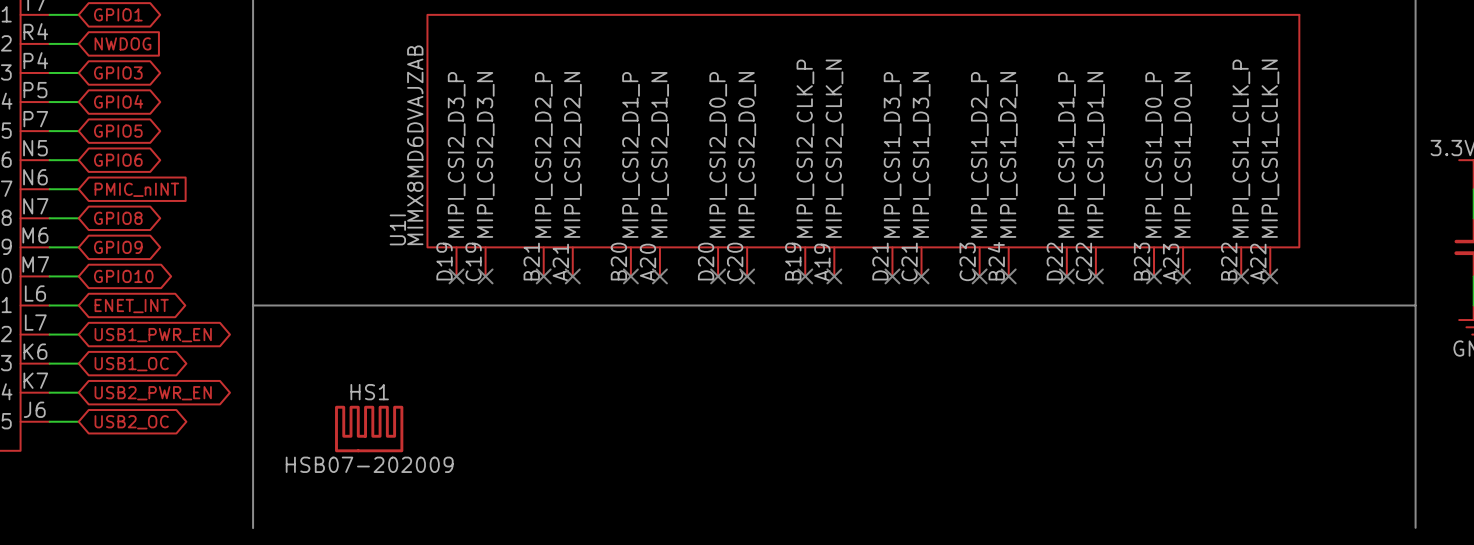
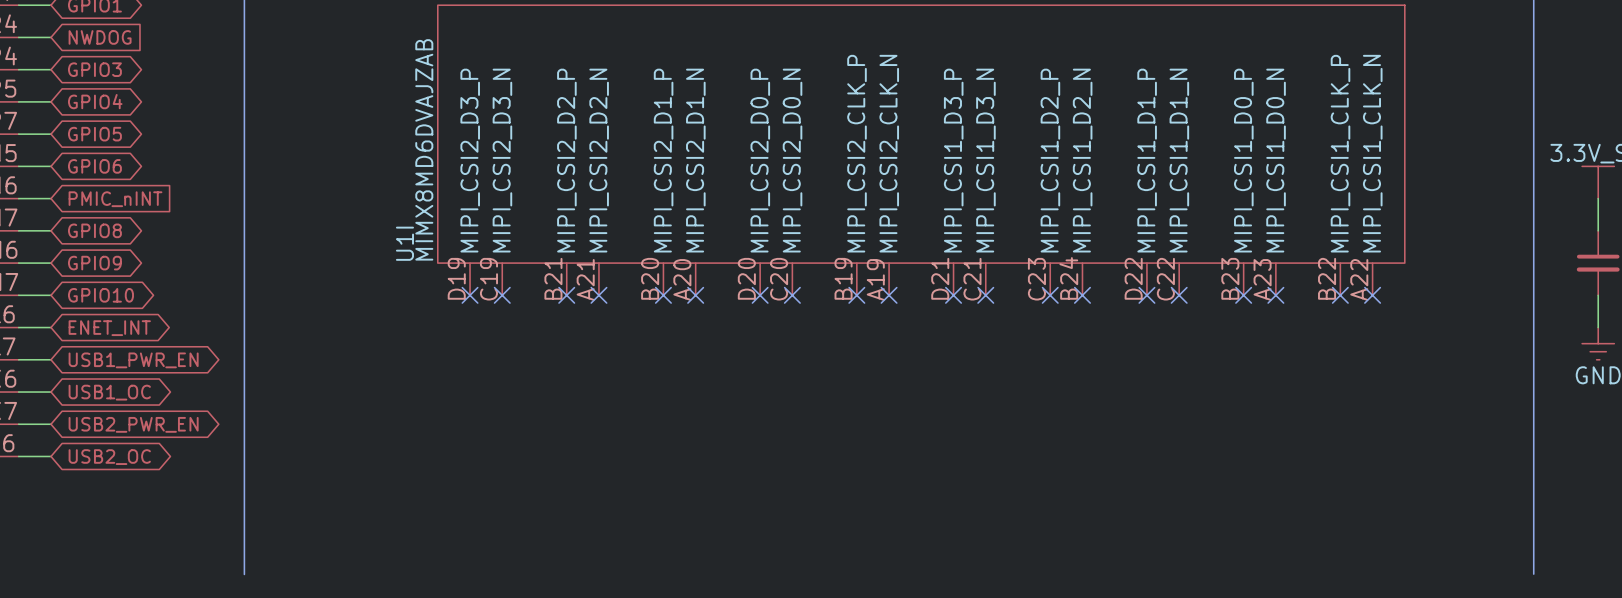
line: (253, 305) (1415, 305) -> none
HS1: HSB07-202009 (369, 429) -> none

